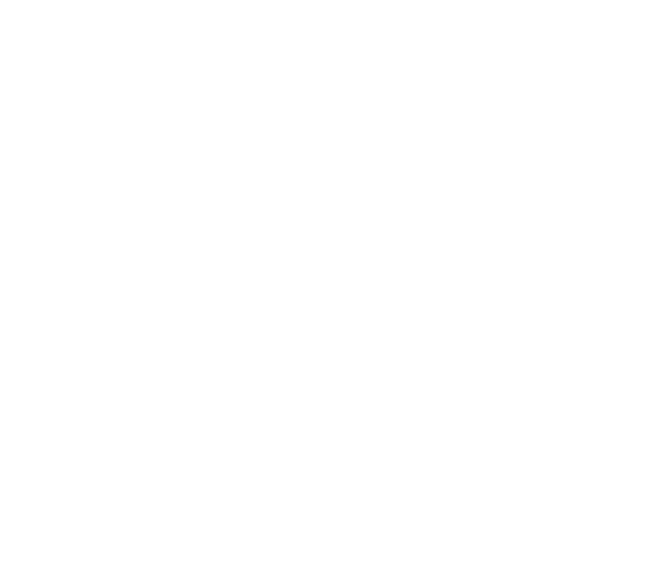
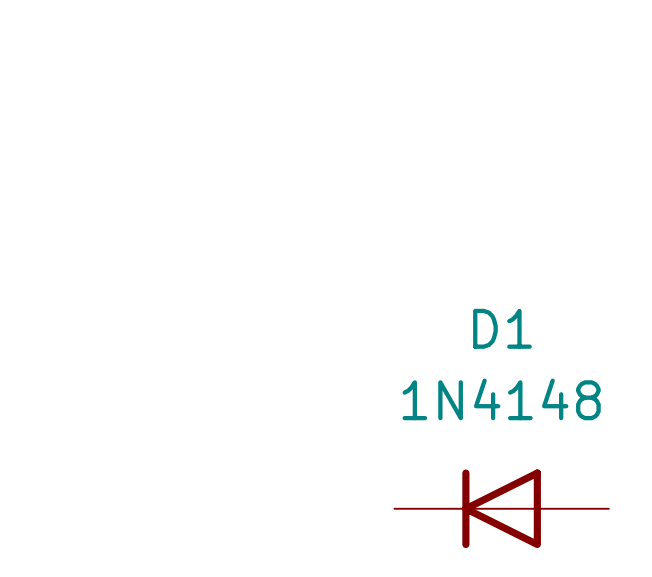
D1: none -> 1N4148 (501, 508)

